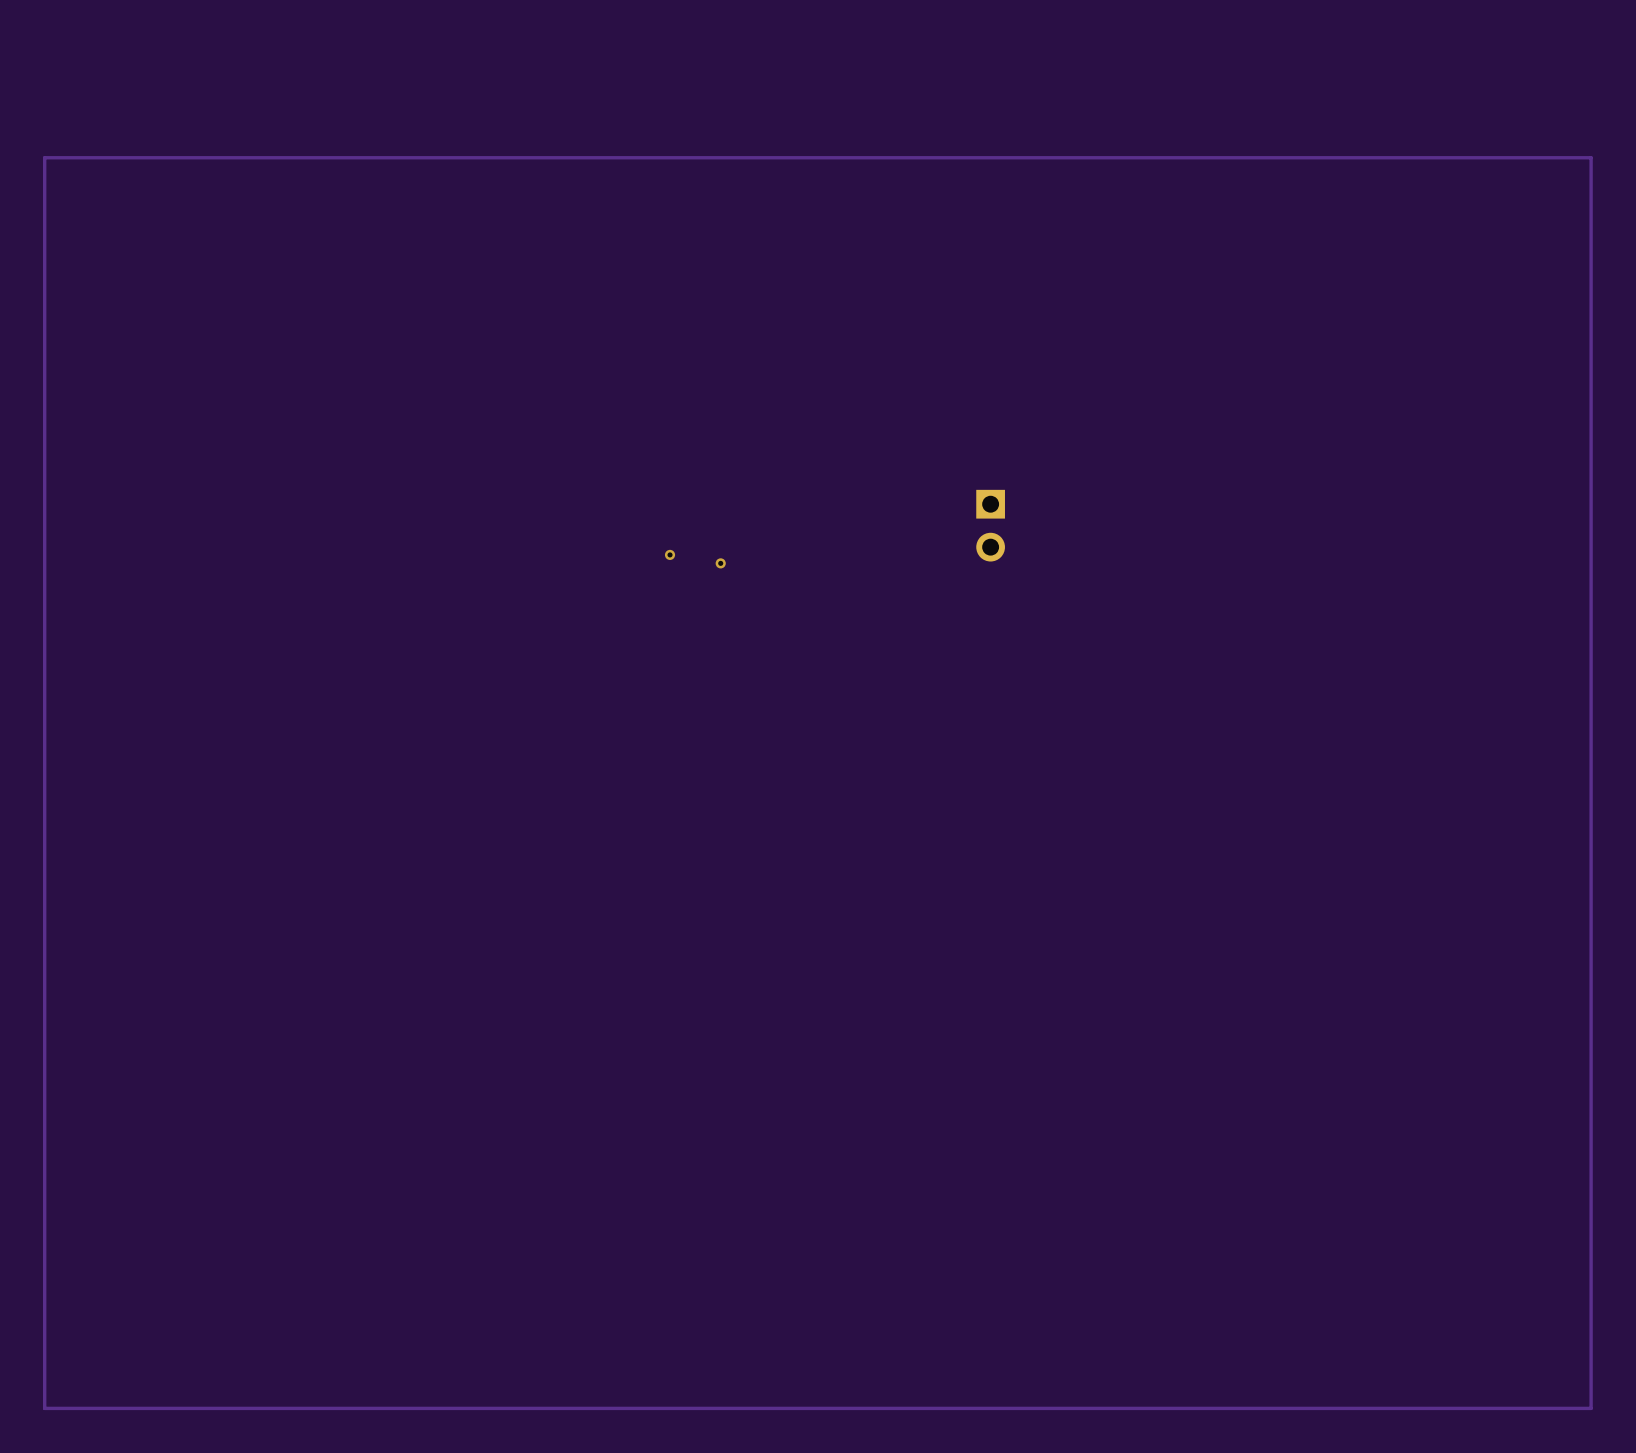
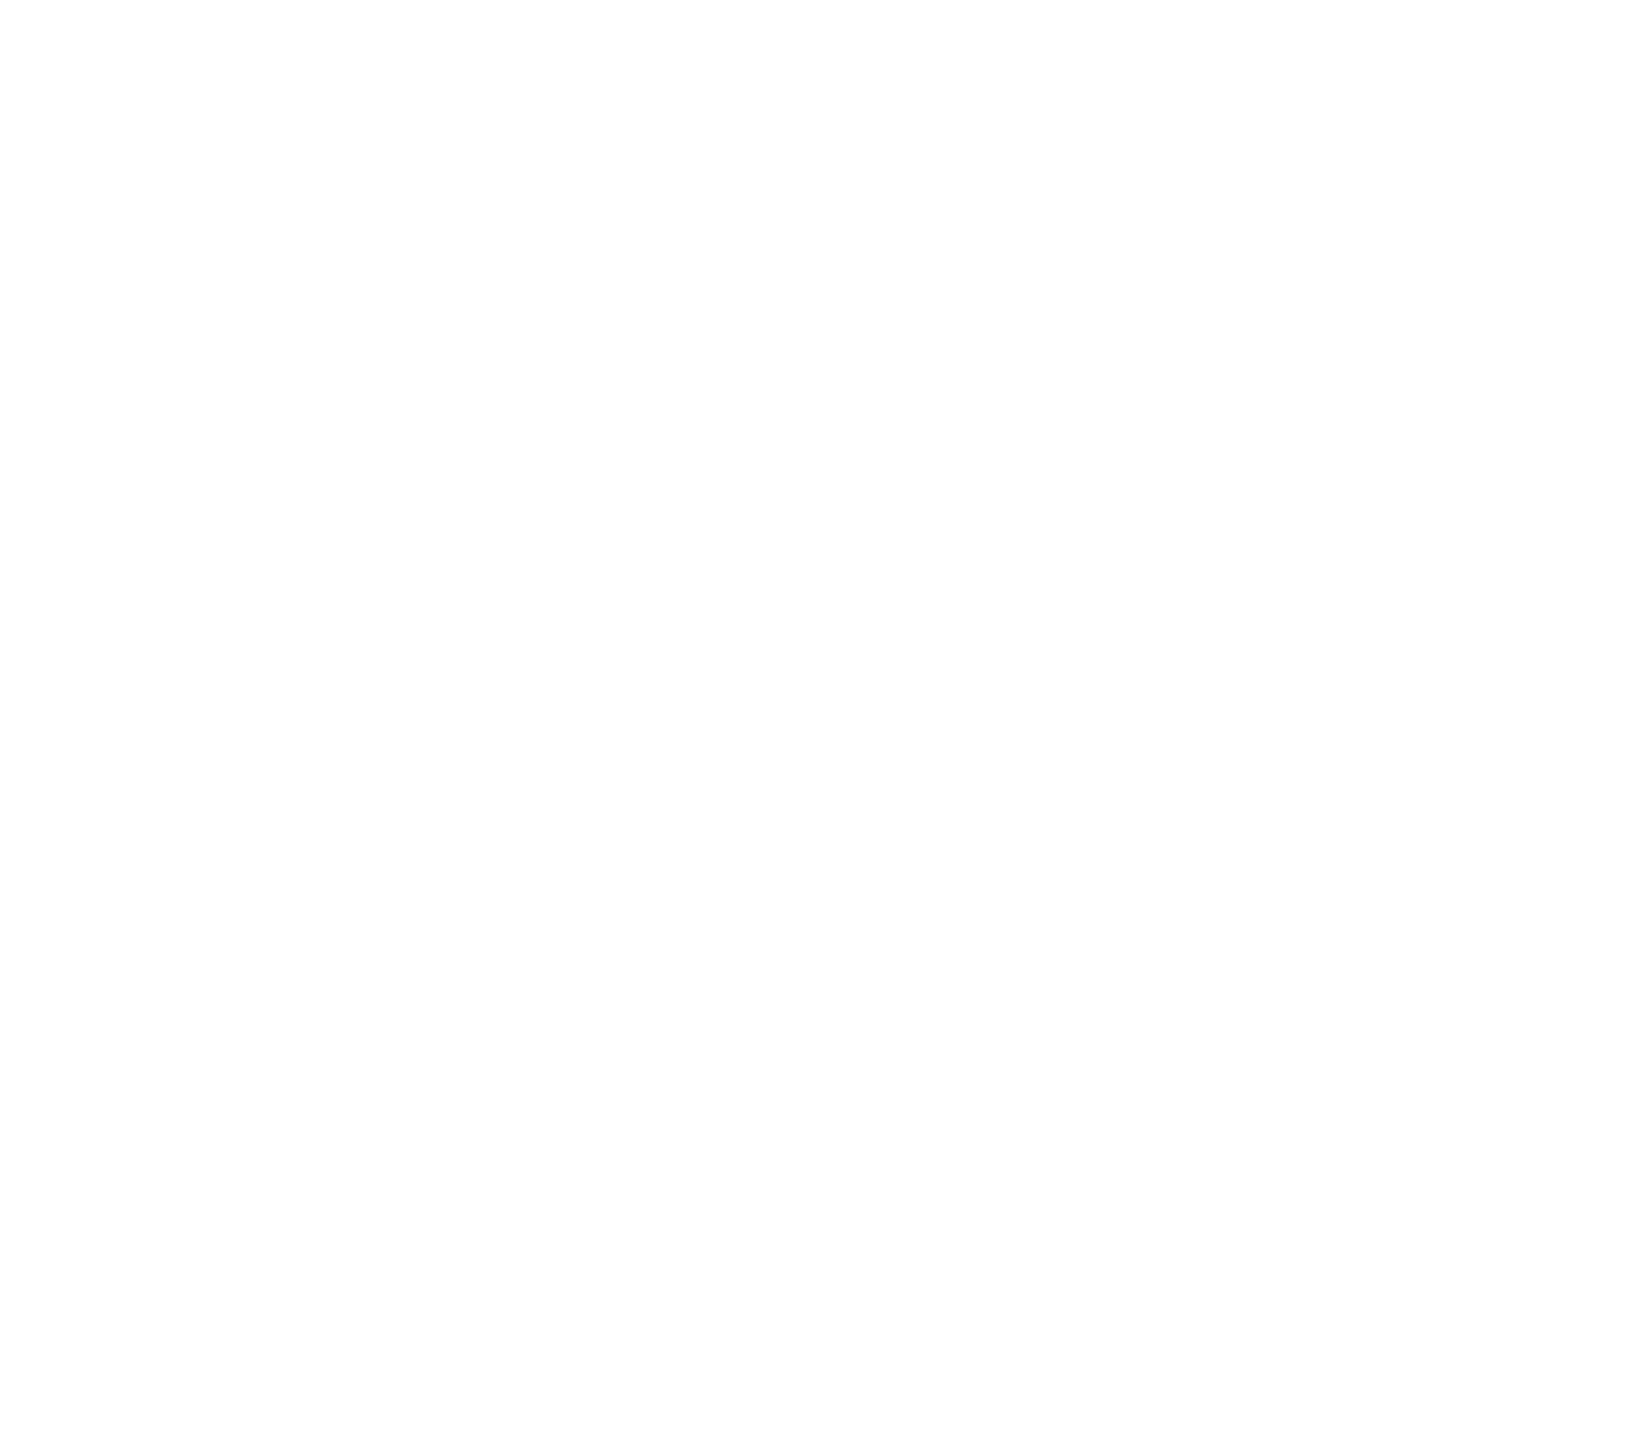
track: (1591, 157) (44, 157) (44, 1408) (1591, 1408) (1591, 157) -> none
part: (990, 525) -> none
via: (670, 554) -> none
via: (720, 563) -> none

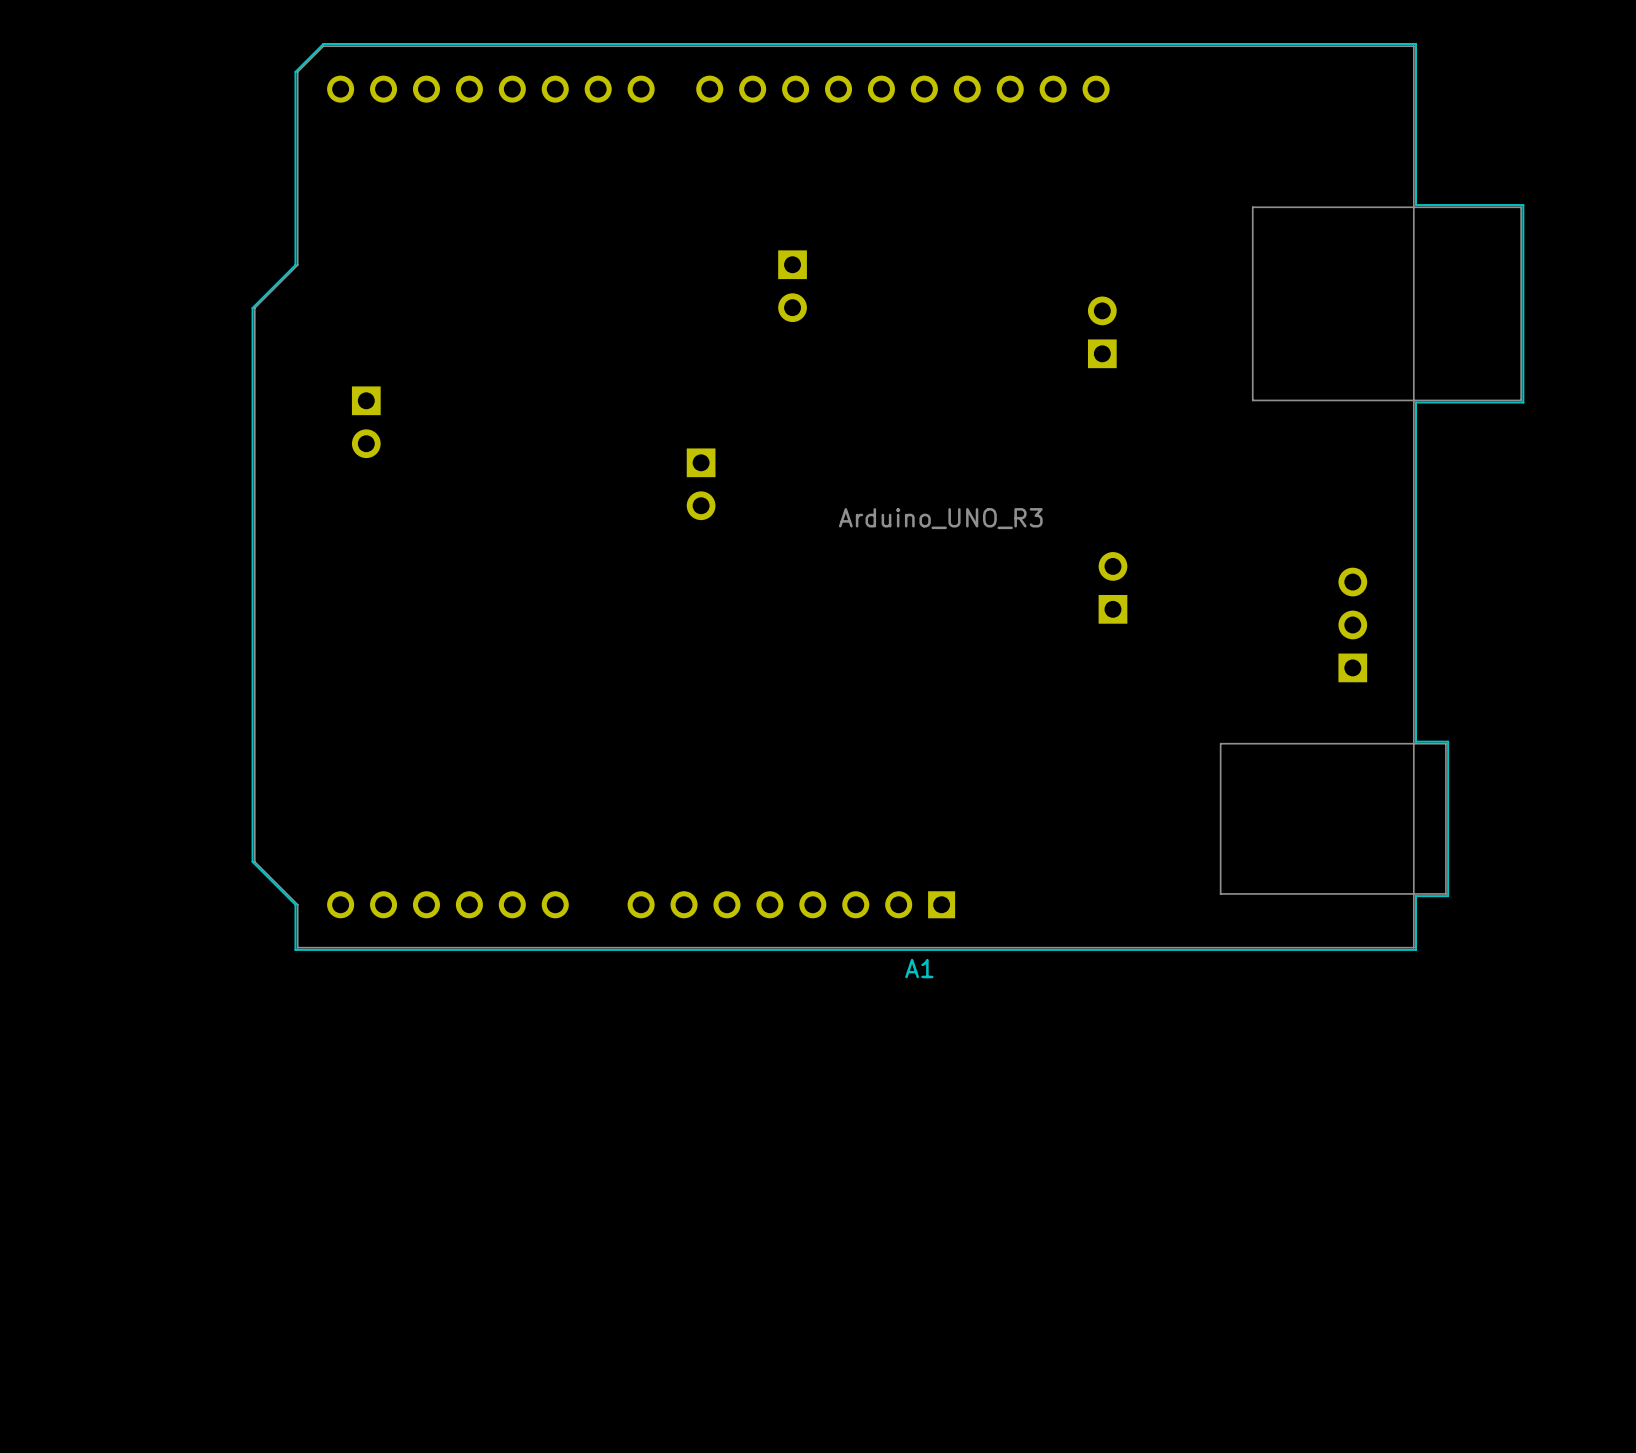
part: none -> (792, 286)
part: none -> (1102, 332)
part: none -> (366, 422)
part: none -> (701, 484)
A1: none -> Arduino_UNO_R3 (887, 496)
part: none -> (1112, 587)
part: none -> (1352, 624)

